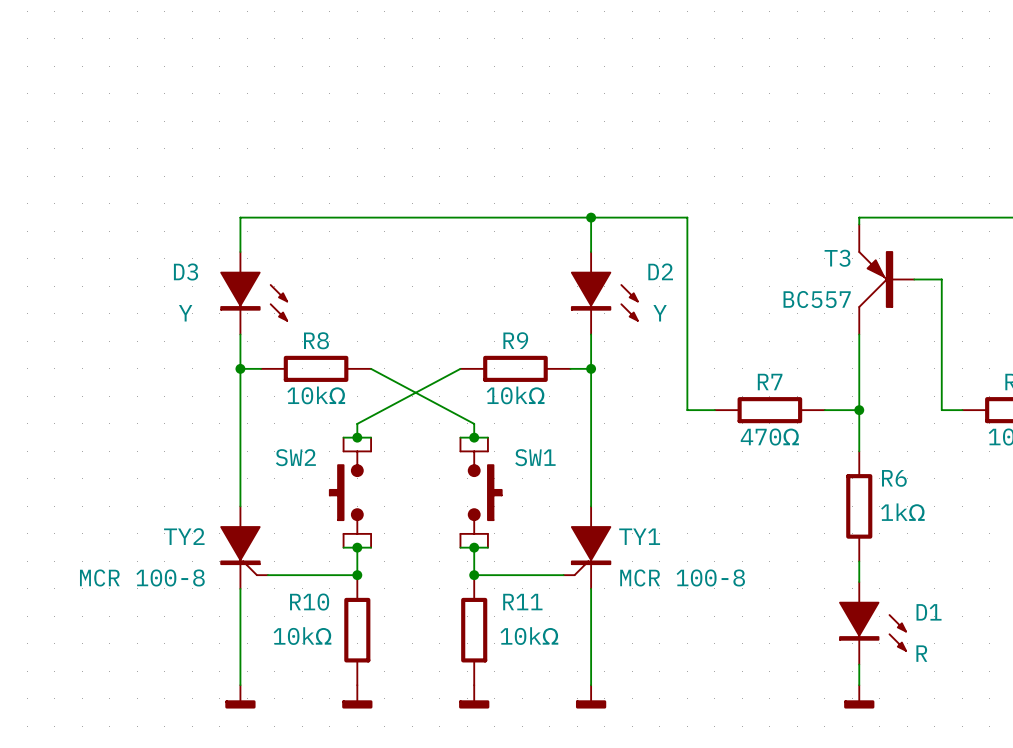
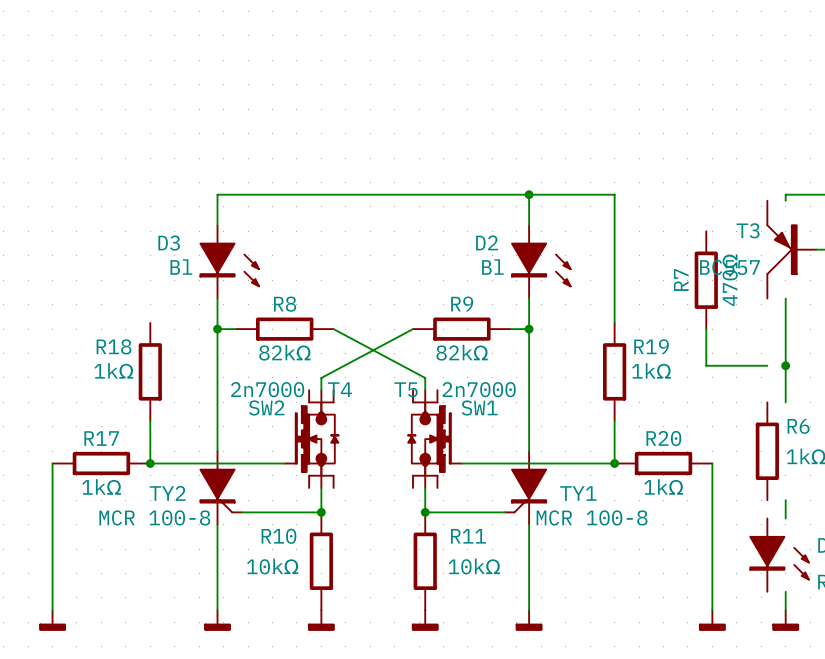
wire: (879, 217) (859, 217) (859, 224) -> (785, 194) (785, 200)
D2 name position: D2 (660, 271) -> D2 (487, 242)
D3 value: Y (185, 313) -> Bl (181, 267)
D2 value: Y (660, 313) -> Bl (492, 267)
wire: (859, 334) (859, 451) -> (785, 298) (785, 402)
wire: (687, 362) (687, 410) (714, 410) -> none
wire: none -> (706, 329) (706, 365) (736, 365)
R7 name position: R7 (770, 382) -> R7 (681, 280)
R8 value: 10kΩ (316, 395) -> 82kΩ (284, 352)
R9 value: 10kΩ (515, 395) -> 82kΩ (462, 352)
R7 rotation: 0° (769, 410) -> 90° clockwise (706, 280)
R7 position: (769, 410) -> (706, 280)
junction position: (859, 410) -> (785, 365)
R18: none -> 1kΩ (150, 371)
R19: none -> 1kΩ (614, 371)
wire: (343, 437) (371, 437) -> none
junction: (357, 437) -> none
wire: (460, 437) (487, 437) -> none
junction: (474, 437) -> none
R7 value position: 470Ω (769, 437) -> 470Ω (730, 280)
wire: none -> (150, 420) (150, 463) (284, 463)
wire: none -> (614, 420) (614, 463) (461, 463)
T4: none -> 2n7000 (311, 439)
T5: none -> 2n7000 (435, 439)
wire: none -> (52, 463) (52, 610)
R17: none -> 1kΩ (101, 463)
junction: none -> (150, 463)
junction: none -> (614, 463)
R20: none -> 1kΩ (663, 463)
wire: none -> (712, 463) (712, 610)
TY2 name position: TY2 (184, 536) -> TY2 (167, 493)
TY1 name position: TY1 (639, 536) -> TY1 (578, 493)
wire: (343, 547) (371, 547) -> none
junction: (357, 547) -> none
wire: (460, 547) (487, 547) -> none
junction: (474, 547) -> none
wire: (859, 561) (859, 582) -> (785, 500) (785, 518)
TY2 value position: MCR 100-8 (142, 577) -> MCR 100-8 (154, 517)
TY1 value position: MCR 100-8 (682, 577) -> MCR 100-8 (592, 517)
wire: (859, 664) (859, 685) -> (785, 591) (785, 610)
power symbol: none -> (52, 620)
power symbol: none -> (712, 620)
power symbol position: (859, 696) -> (785, 620)

